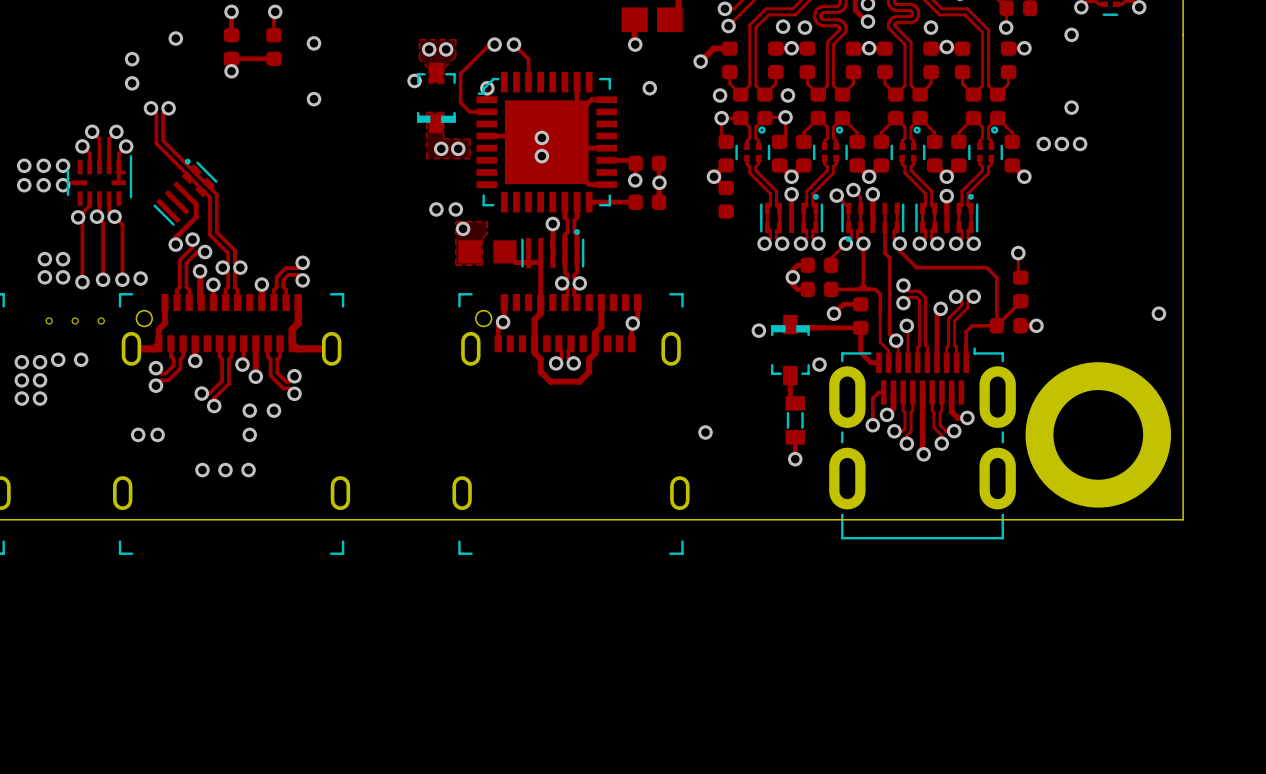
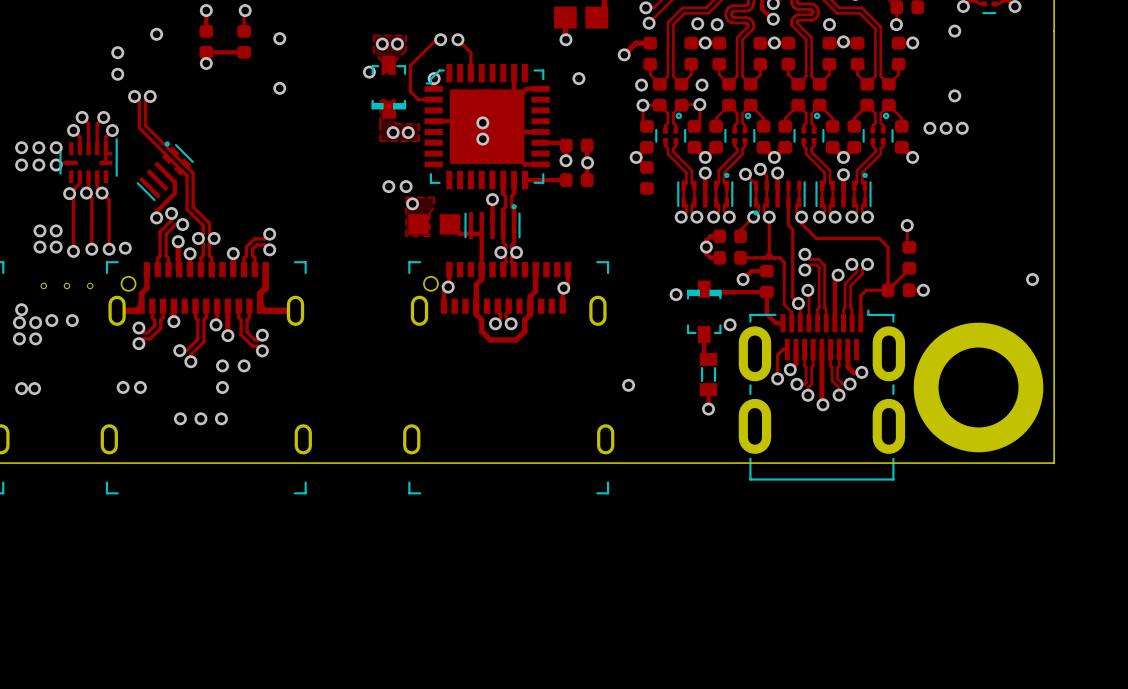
via: none -> (21, 309)
via: (21, 398) -> none
via: (40, 398) -> none
via: none -> (21, 388)
via: none -> (34, 388)

